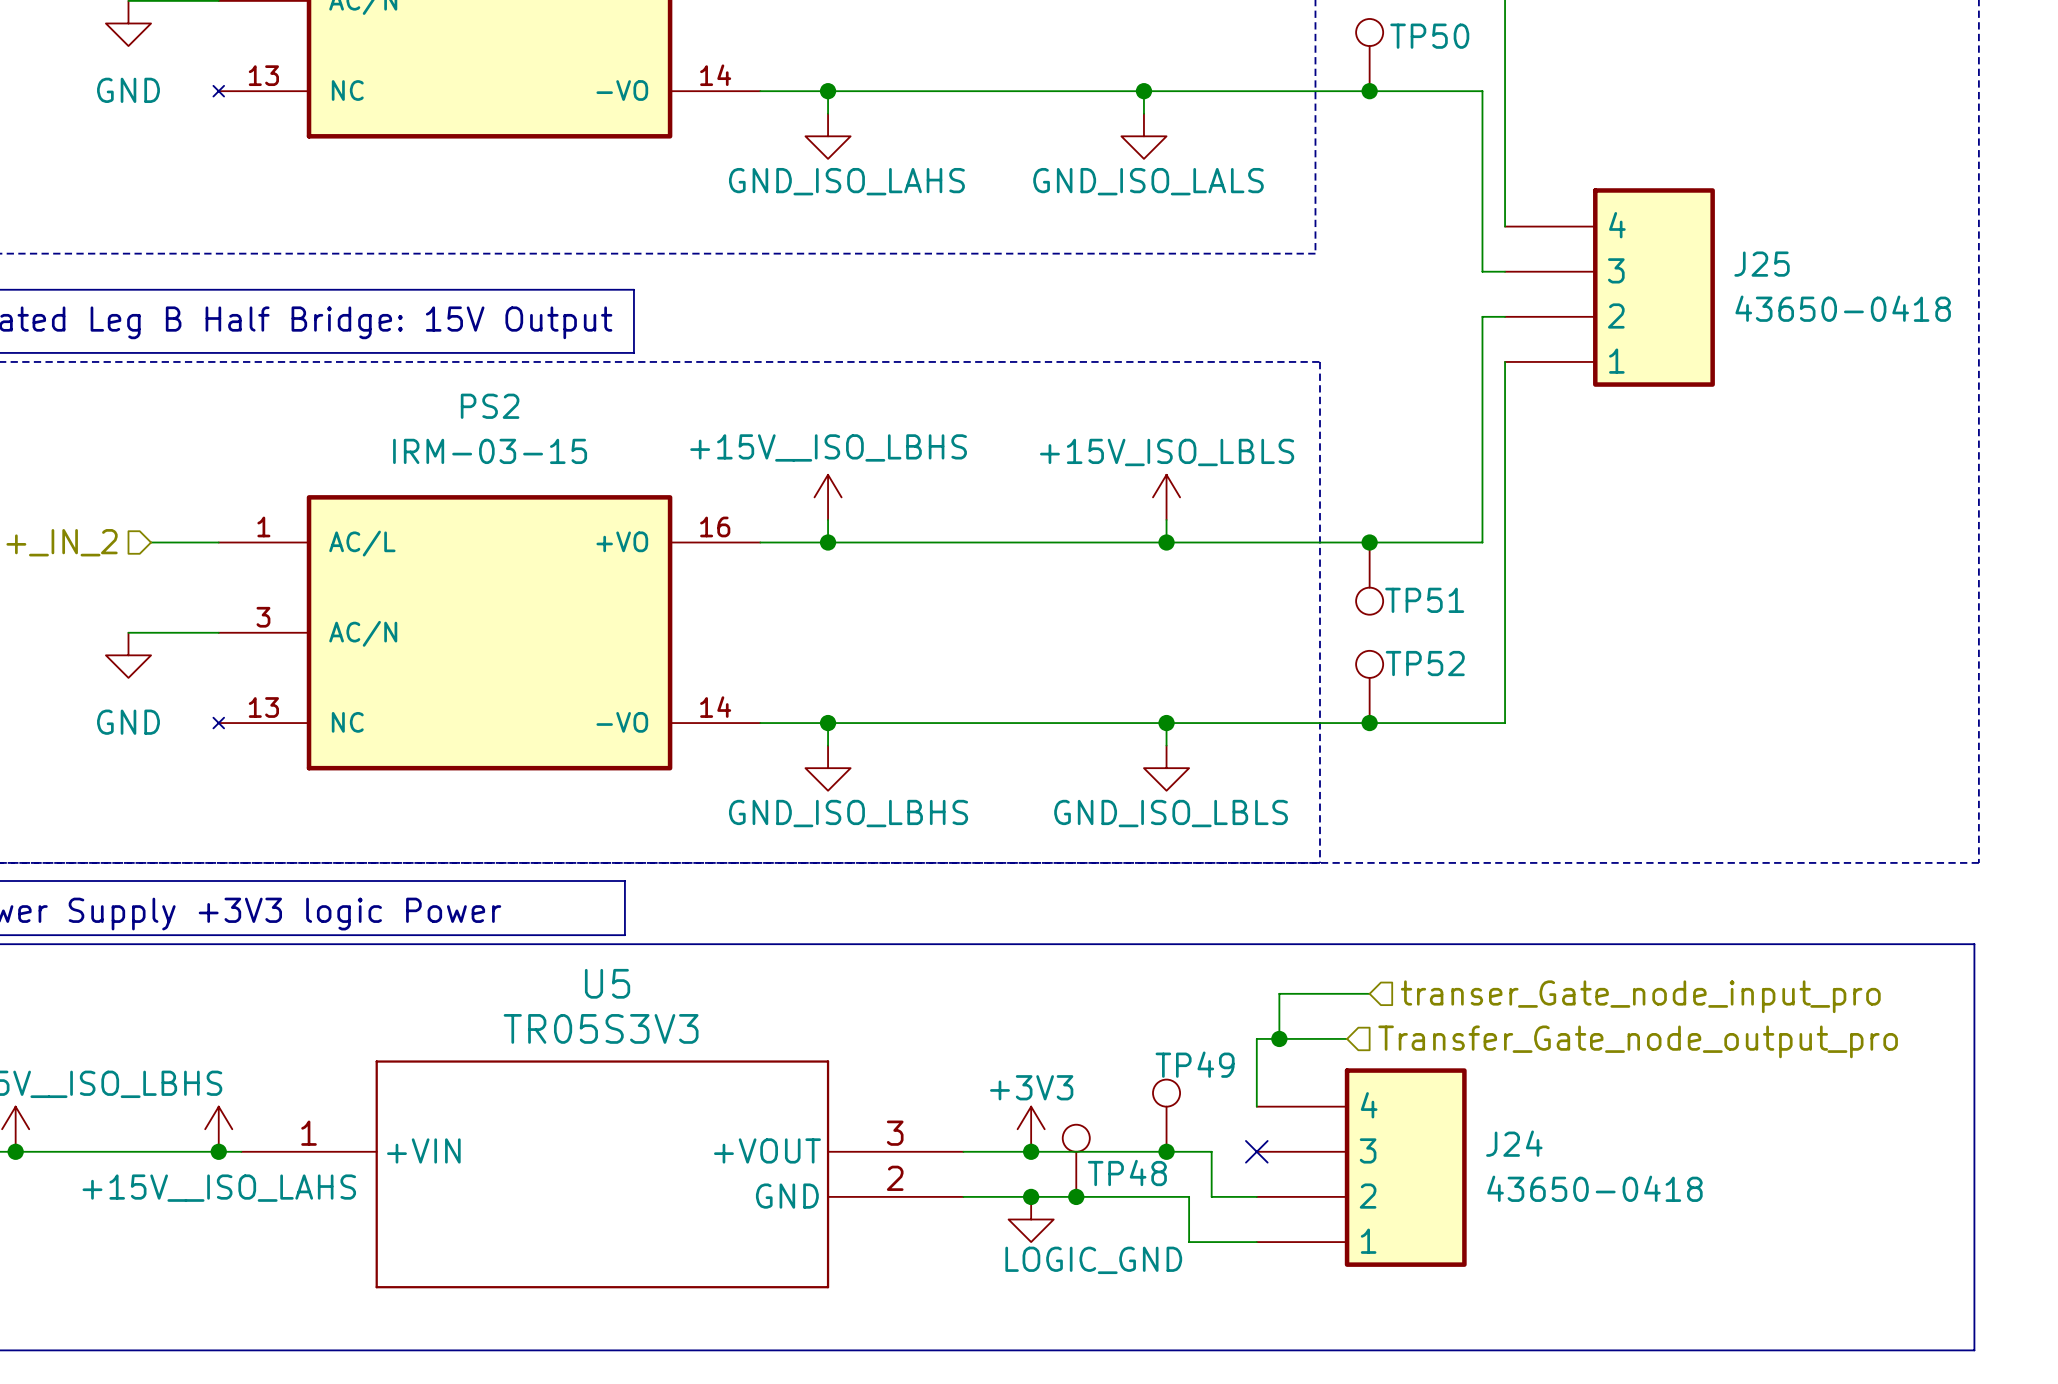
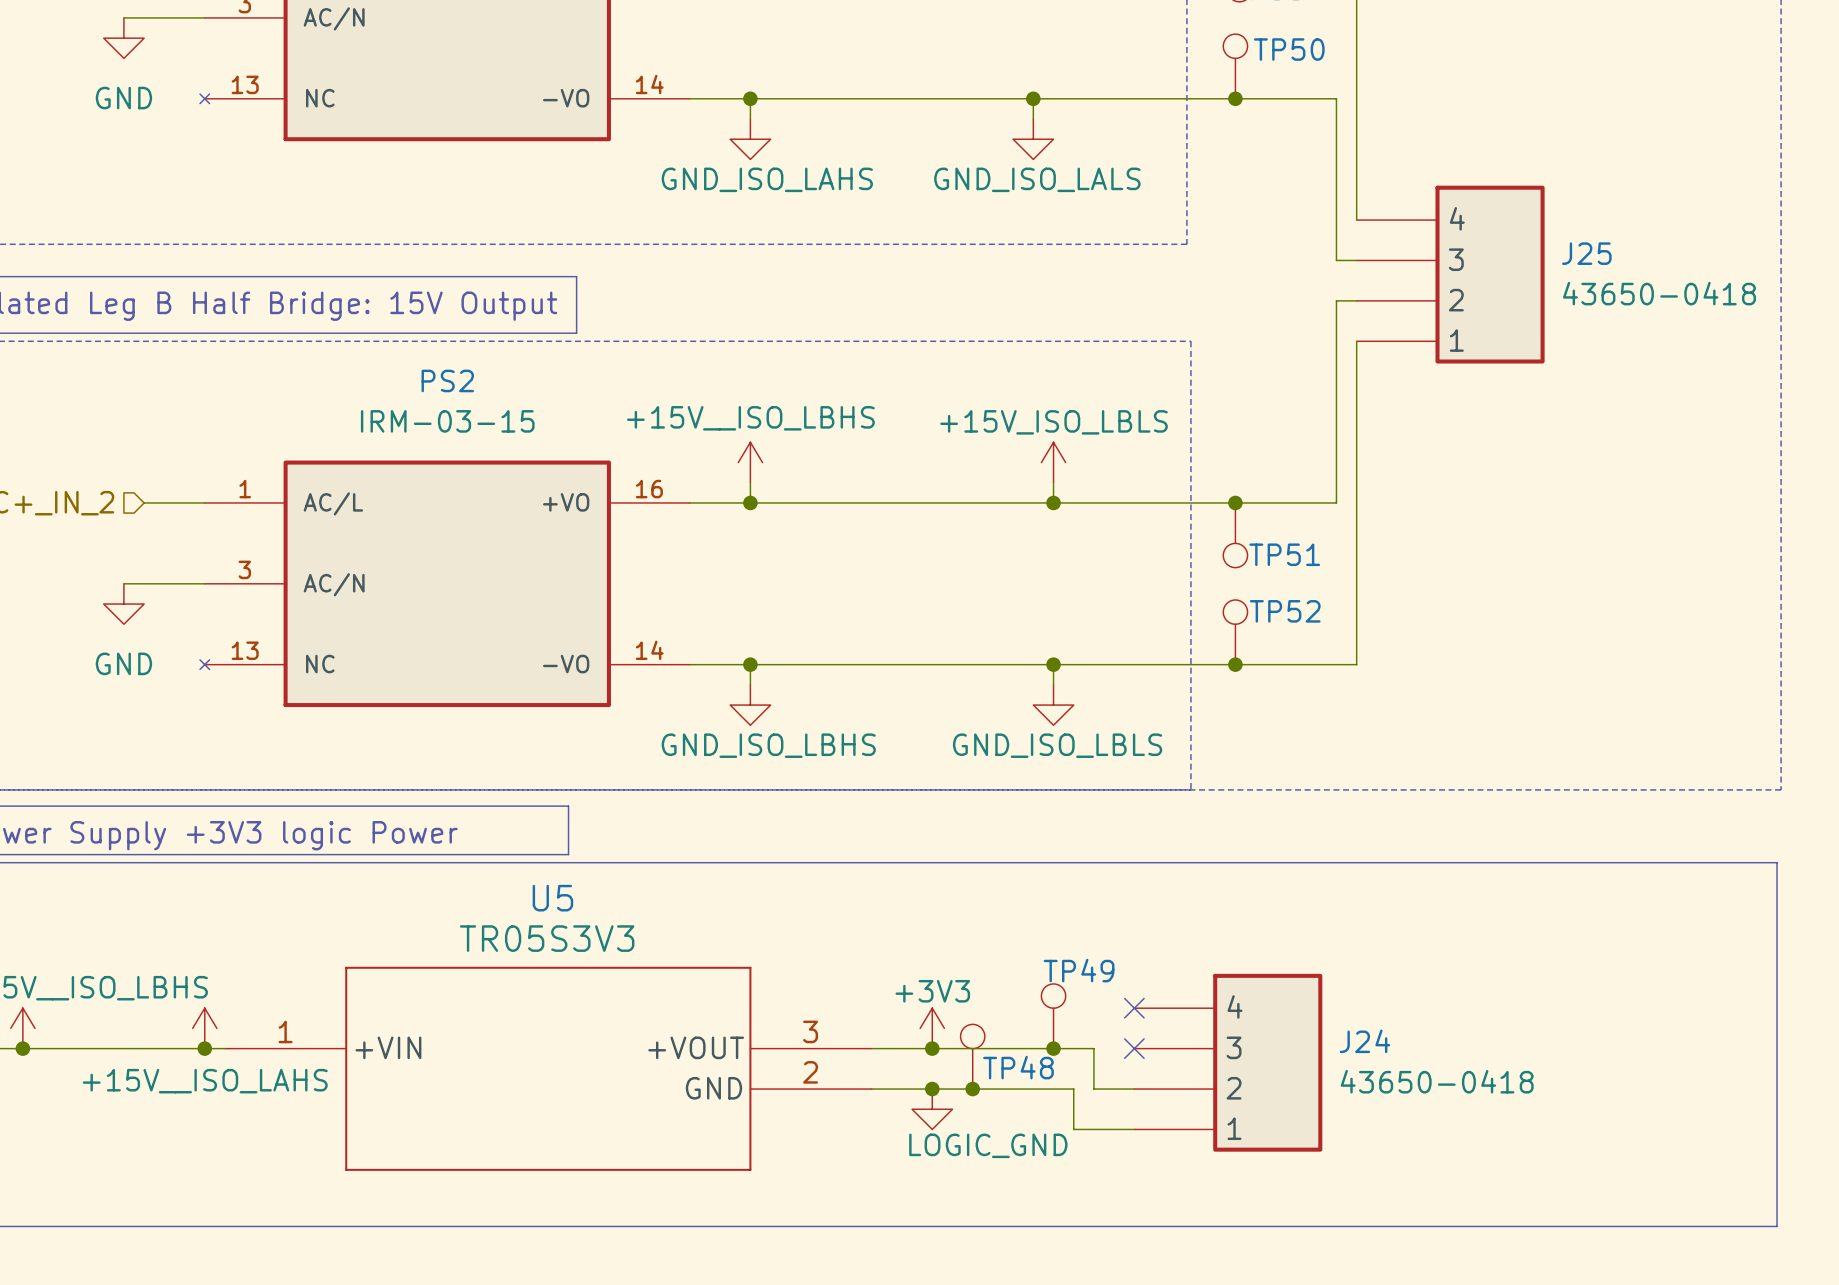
wire: (1369, 993) (1279, 993) (1279, 1038) -> none
hierarchical label: transer_Gate_node_input_pro (1640, 996) -> none
junction: (1279, 1038) -> none
wire: (1347, 1038) (1256, 1038) (1256, 1106) -> none
hierarchical label: Transfer_Gate_node_output_pro (1638, 1041) -> none
no-connect mark: none -> (1134, 1008)

